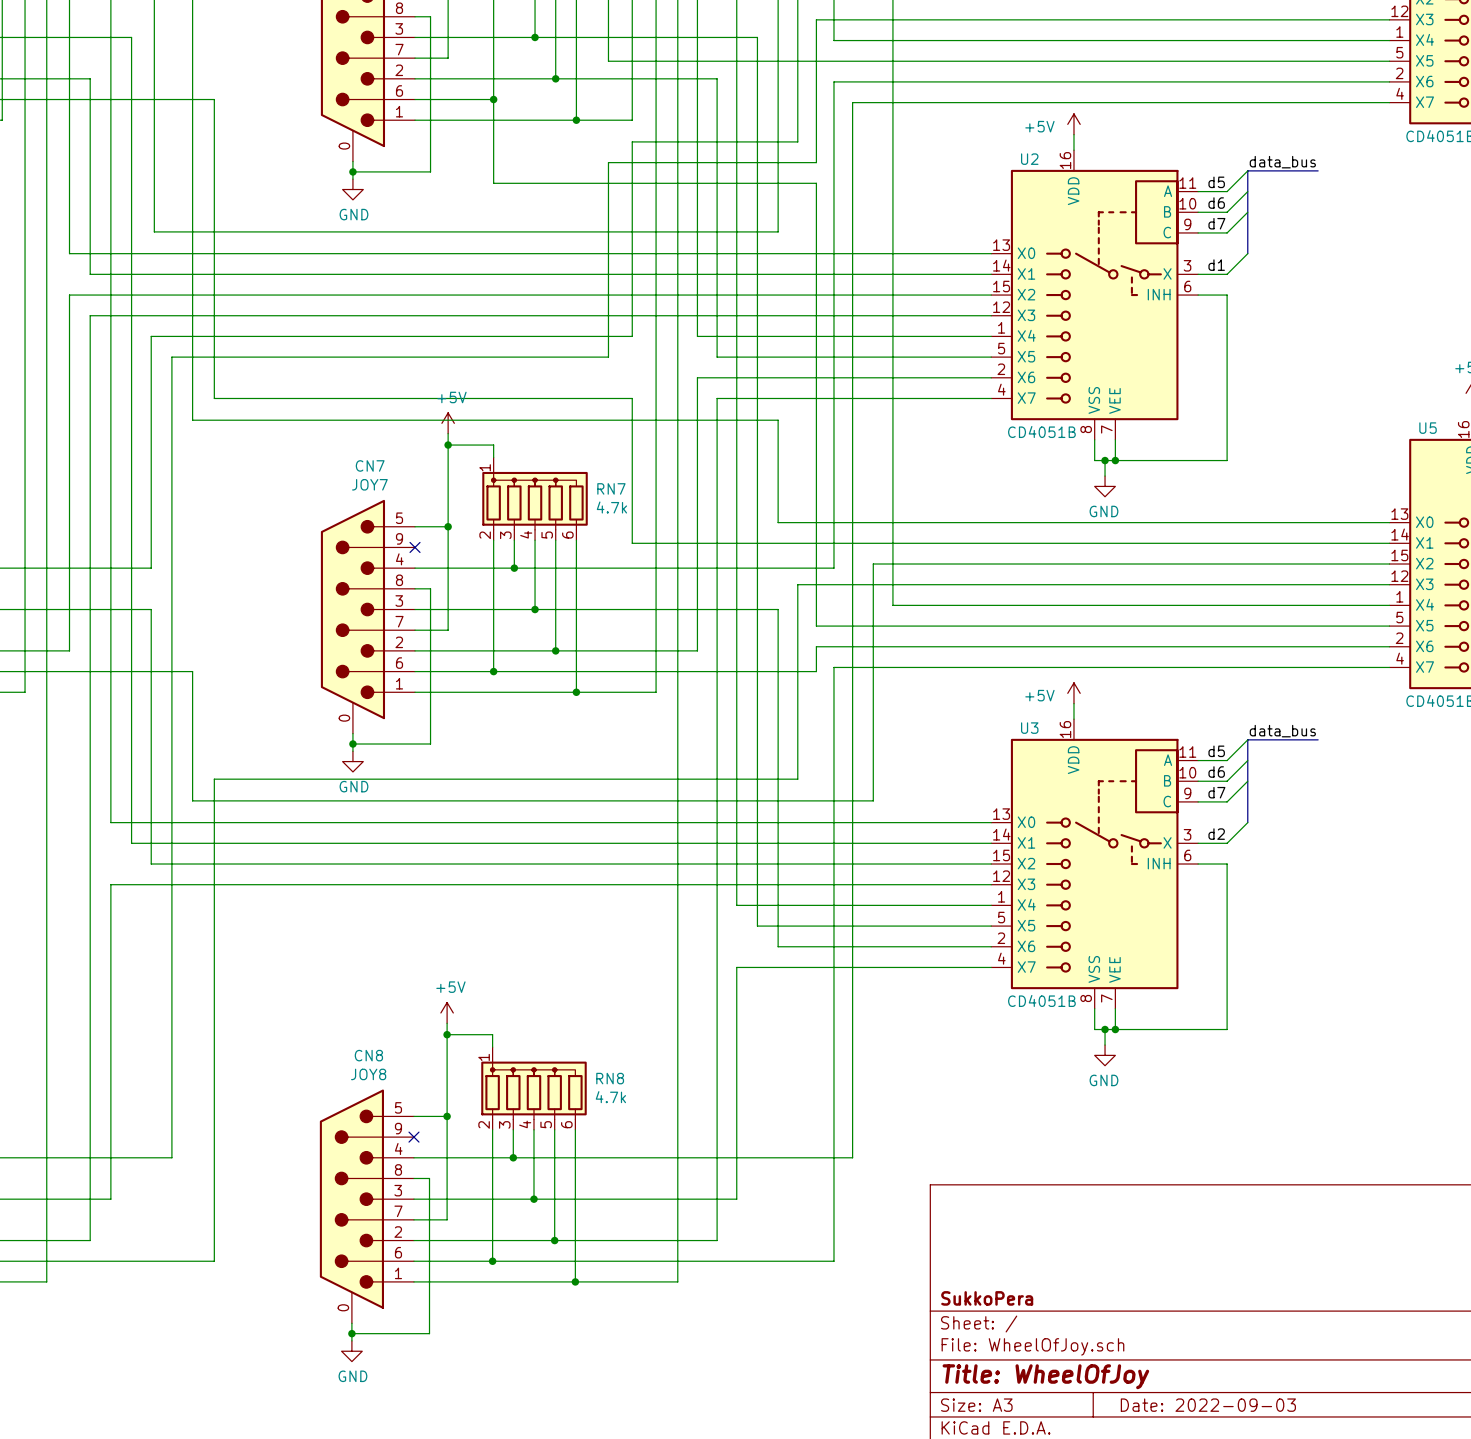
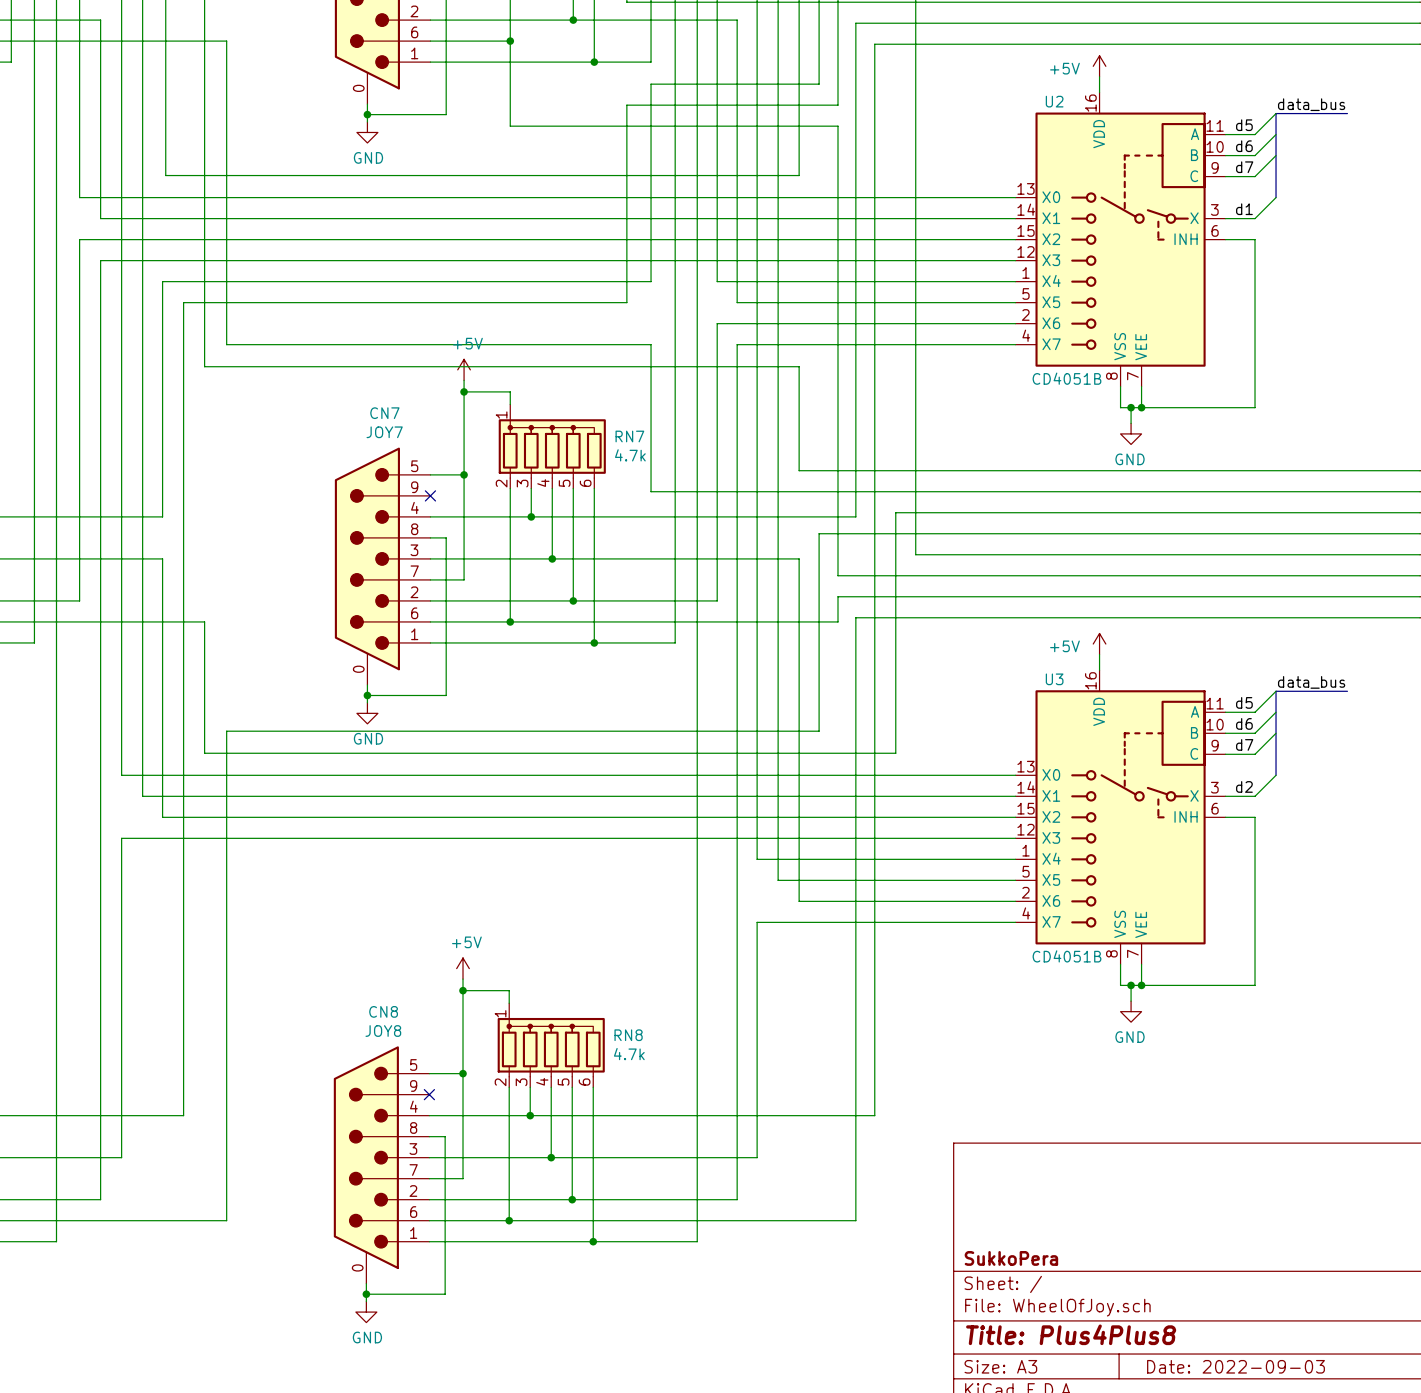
title block: Title: WheelOfJoy (1045, 1376) -> Title: Plus4Plus8 (1071, 1334)

